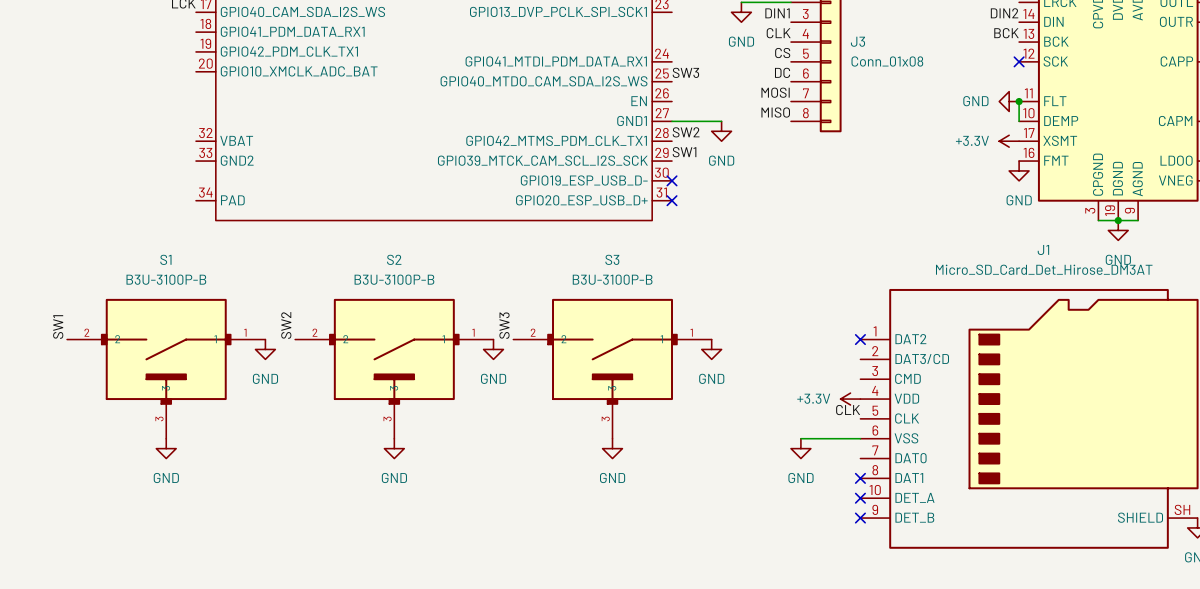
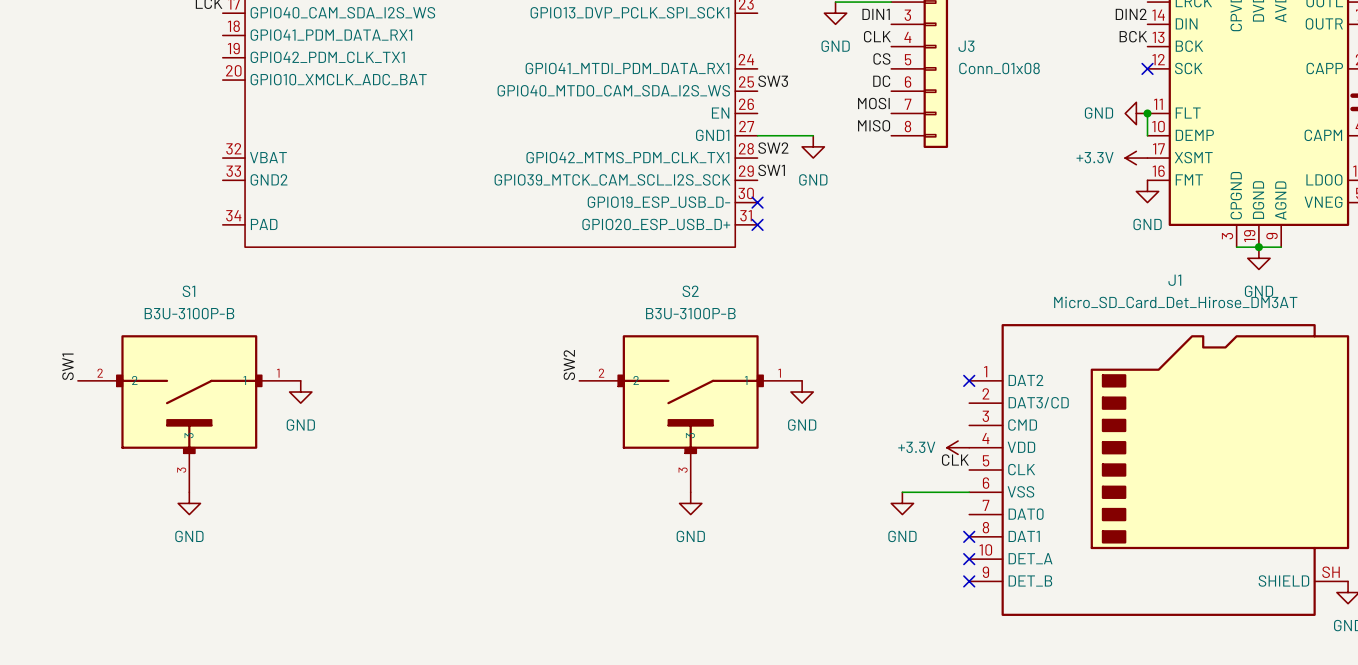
S3 name: S3 (612, 259) -> S2 (690, 291)
label: SW2 (286, 325) -> none
label: SW3 (504, 325) -> SW2 (569, 365)
power symbol: GND (493, 349) -> none
S2: B3U-3100P-B (394, 368) -> none
power symbol: GND (394, 448) -> none

